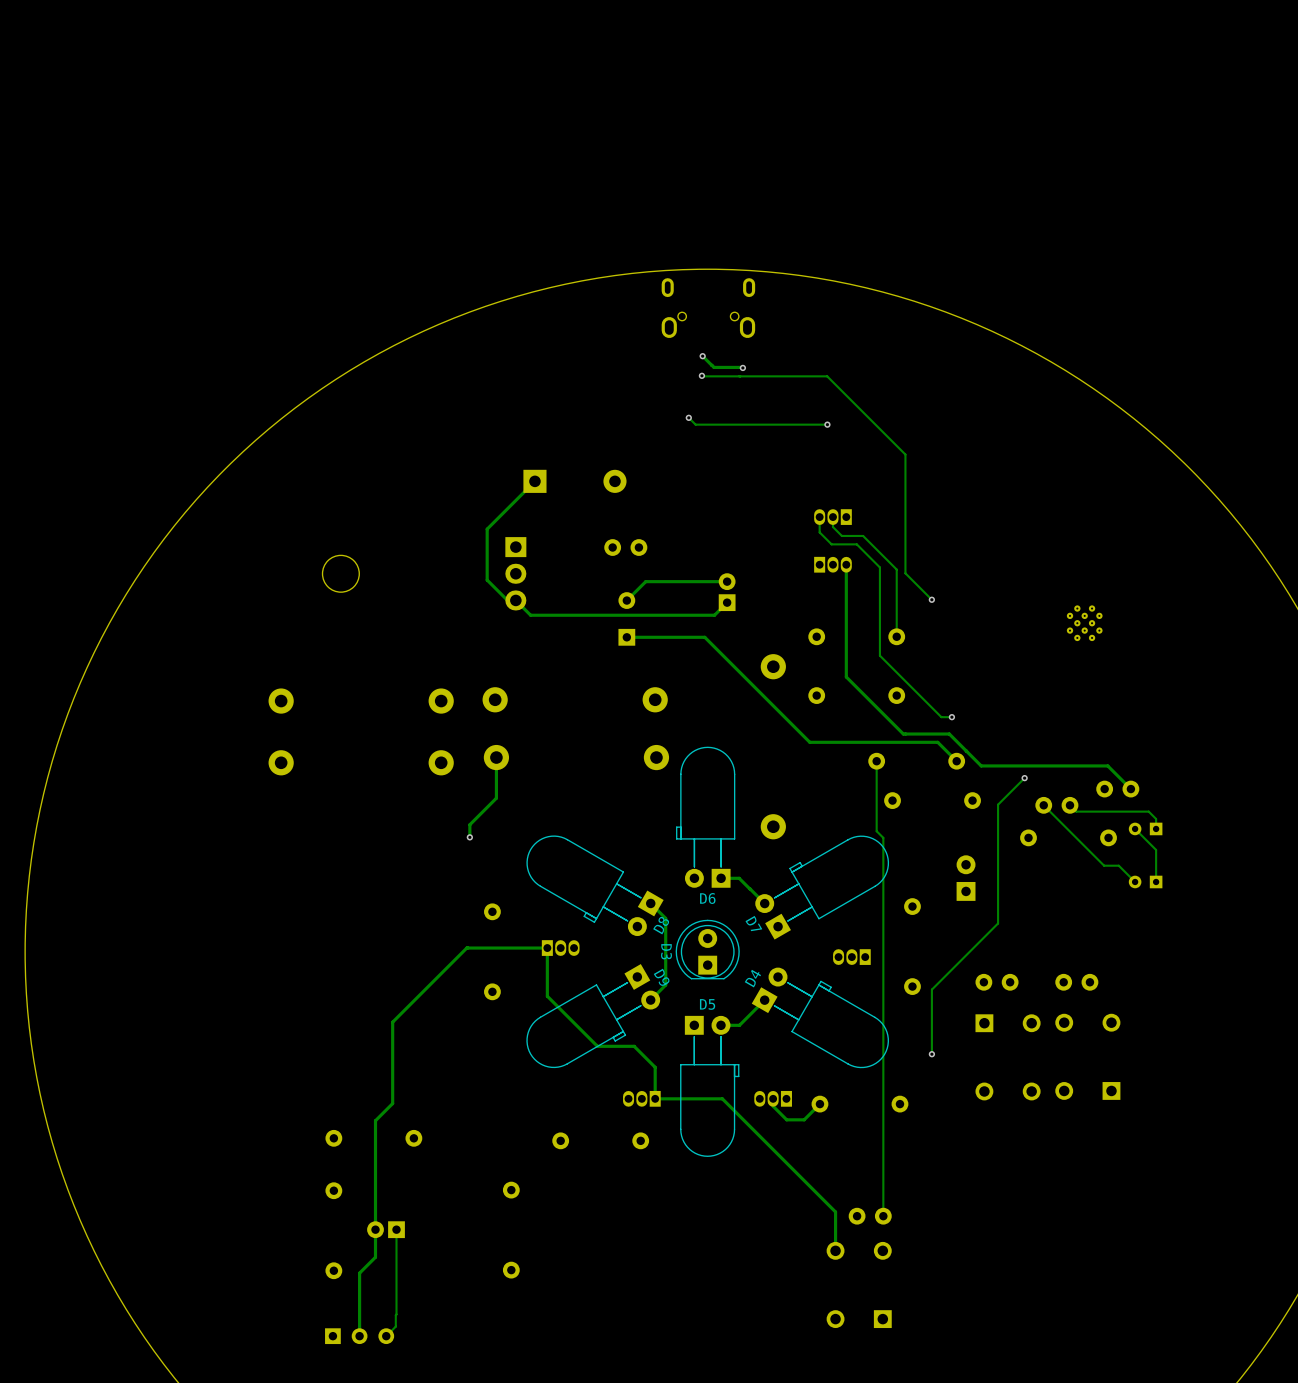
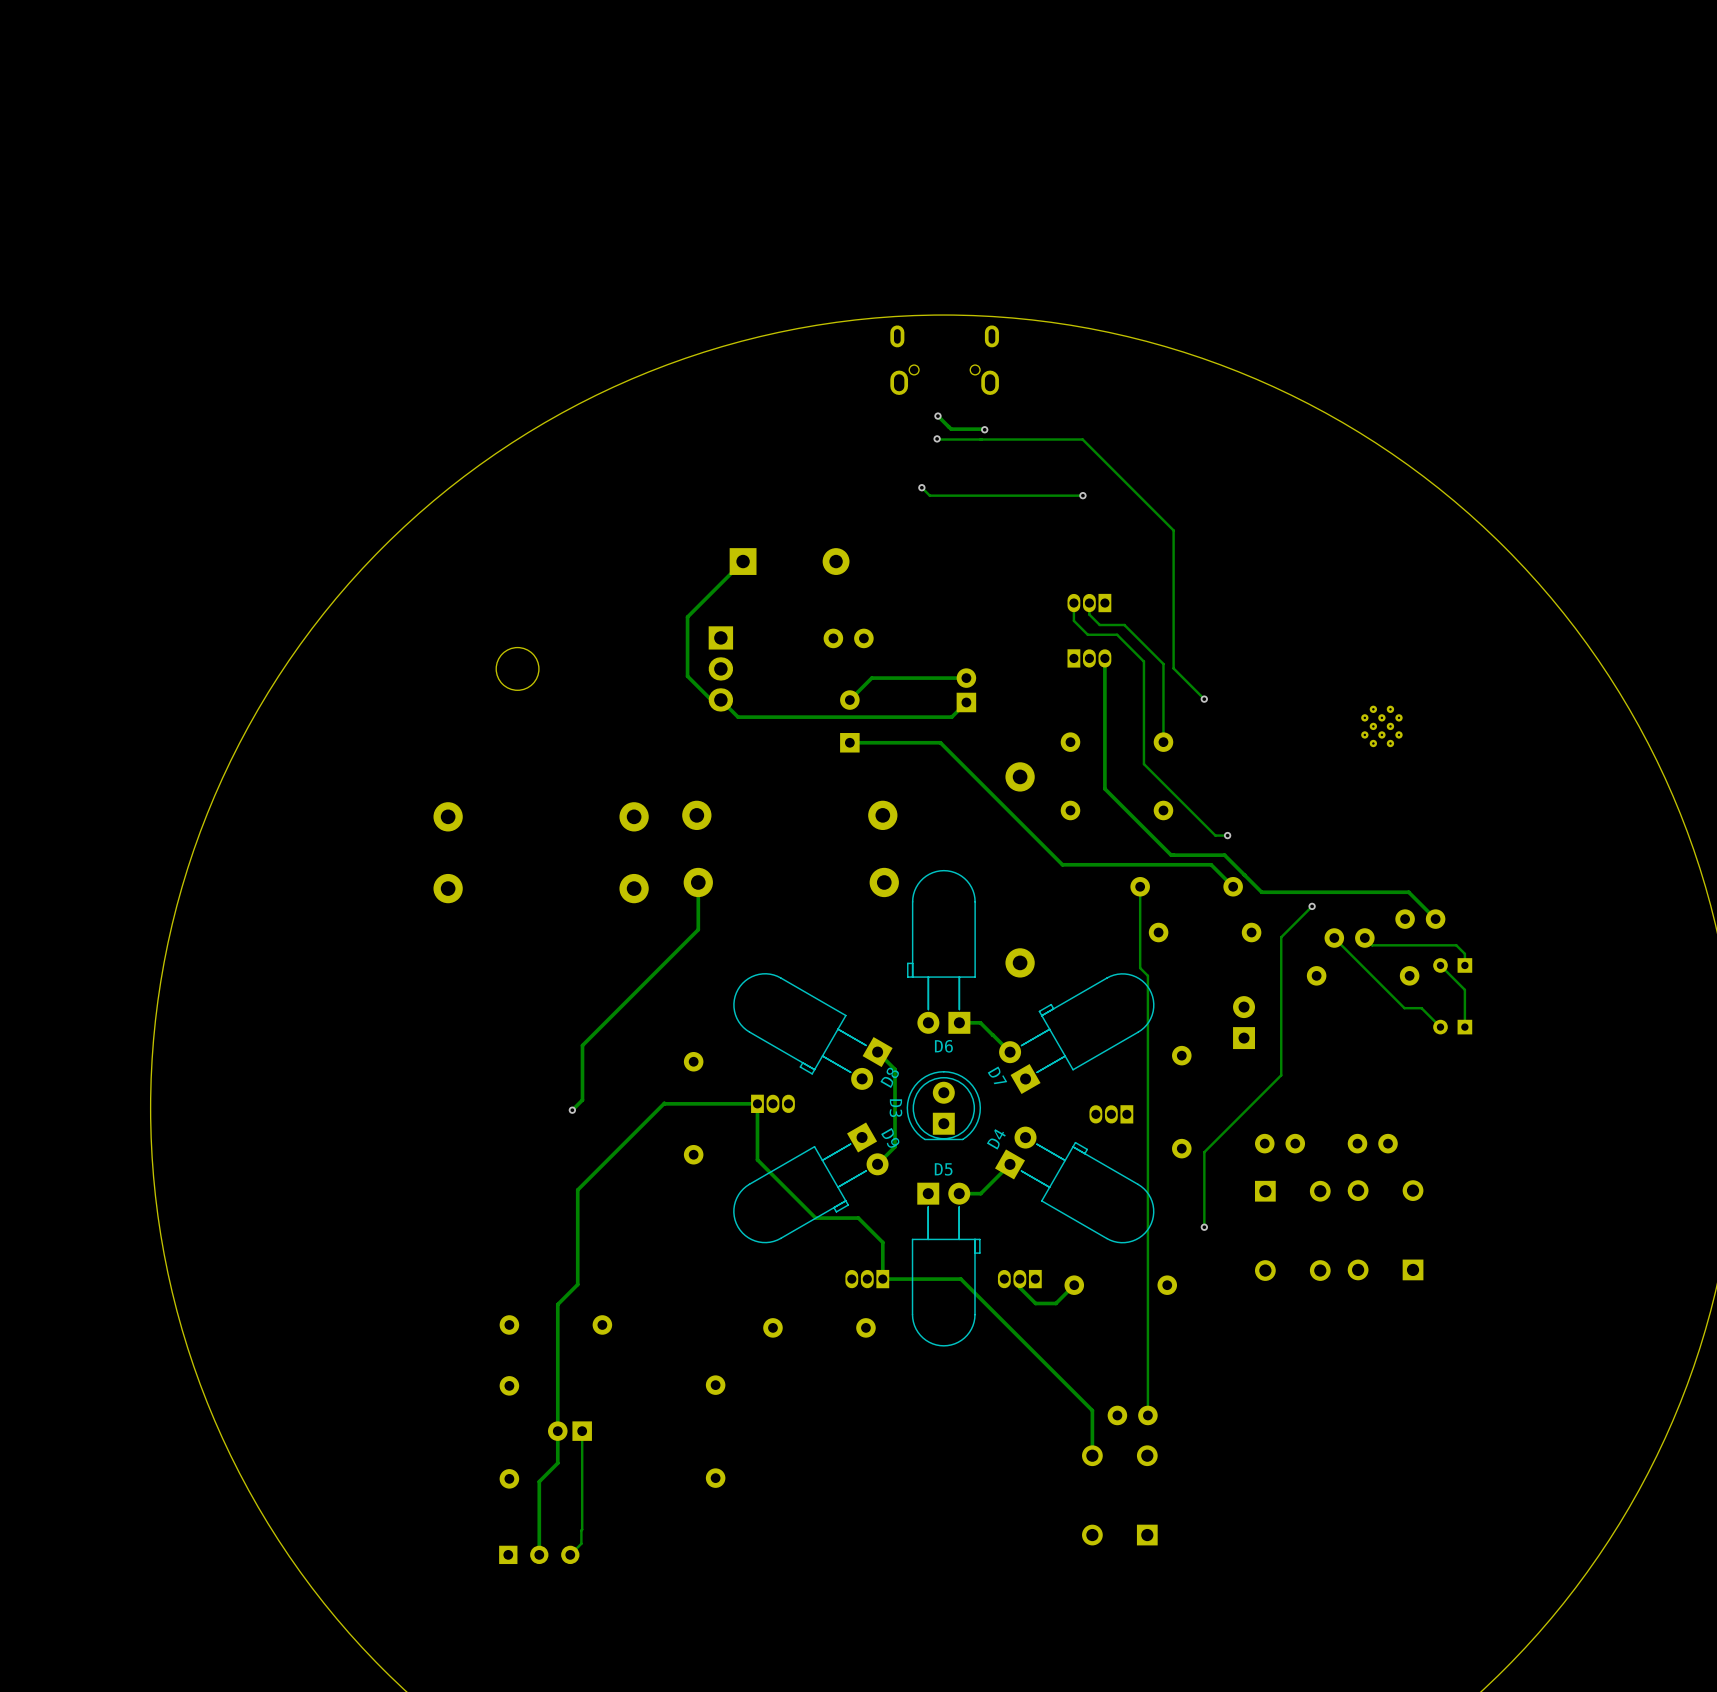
track: (469, 824) (469, 837) -> (667, 960) (582, 1045) (582, 1100) (572, 1110)
via: (469, 837) -> none
via: none -> (572, 1110)

